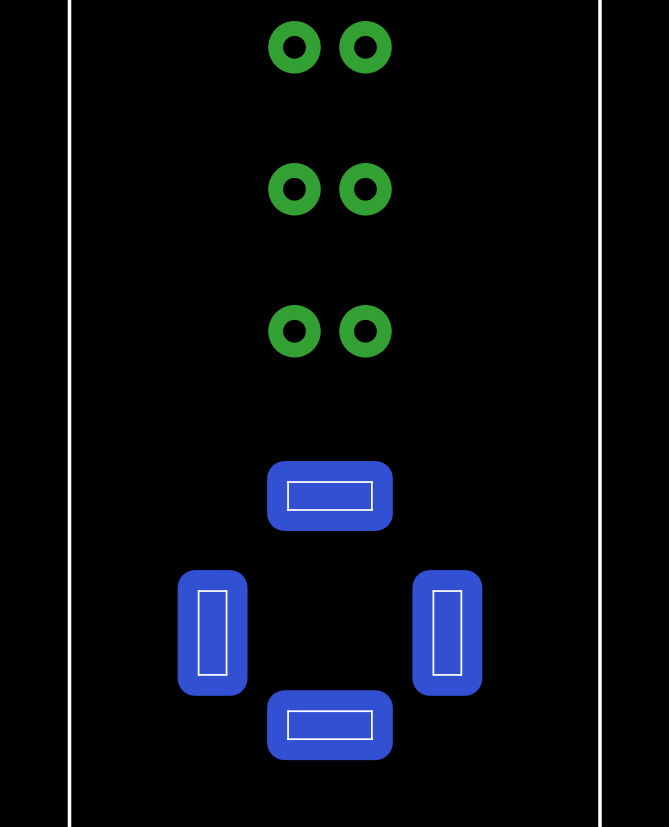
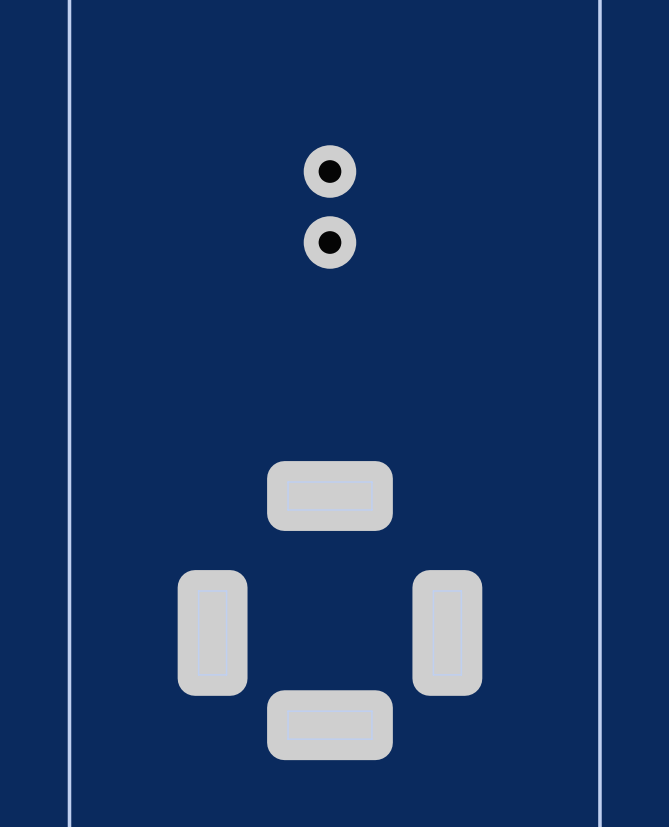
part: (329, 47) -> none
part rotation: 0° (329, 189) -> 90° clockwise (329, 207)
part: (329, 331) -> none

